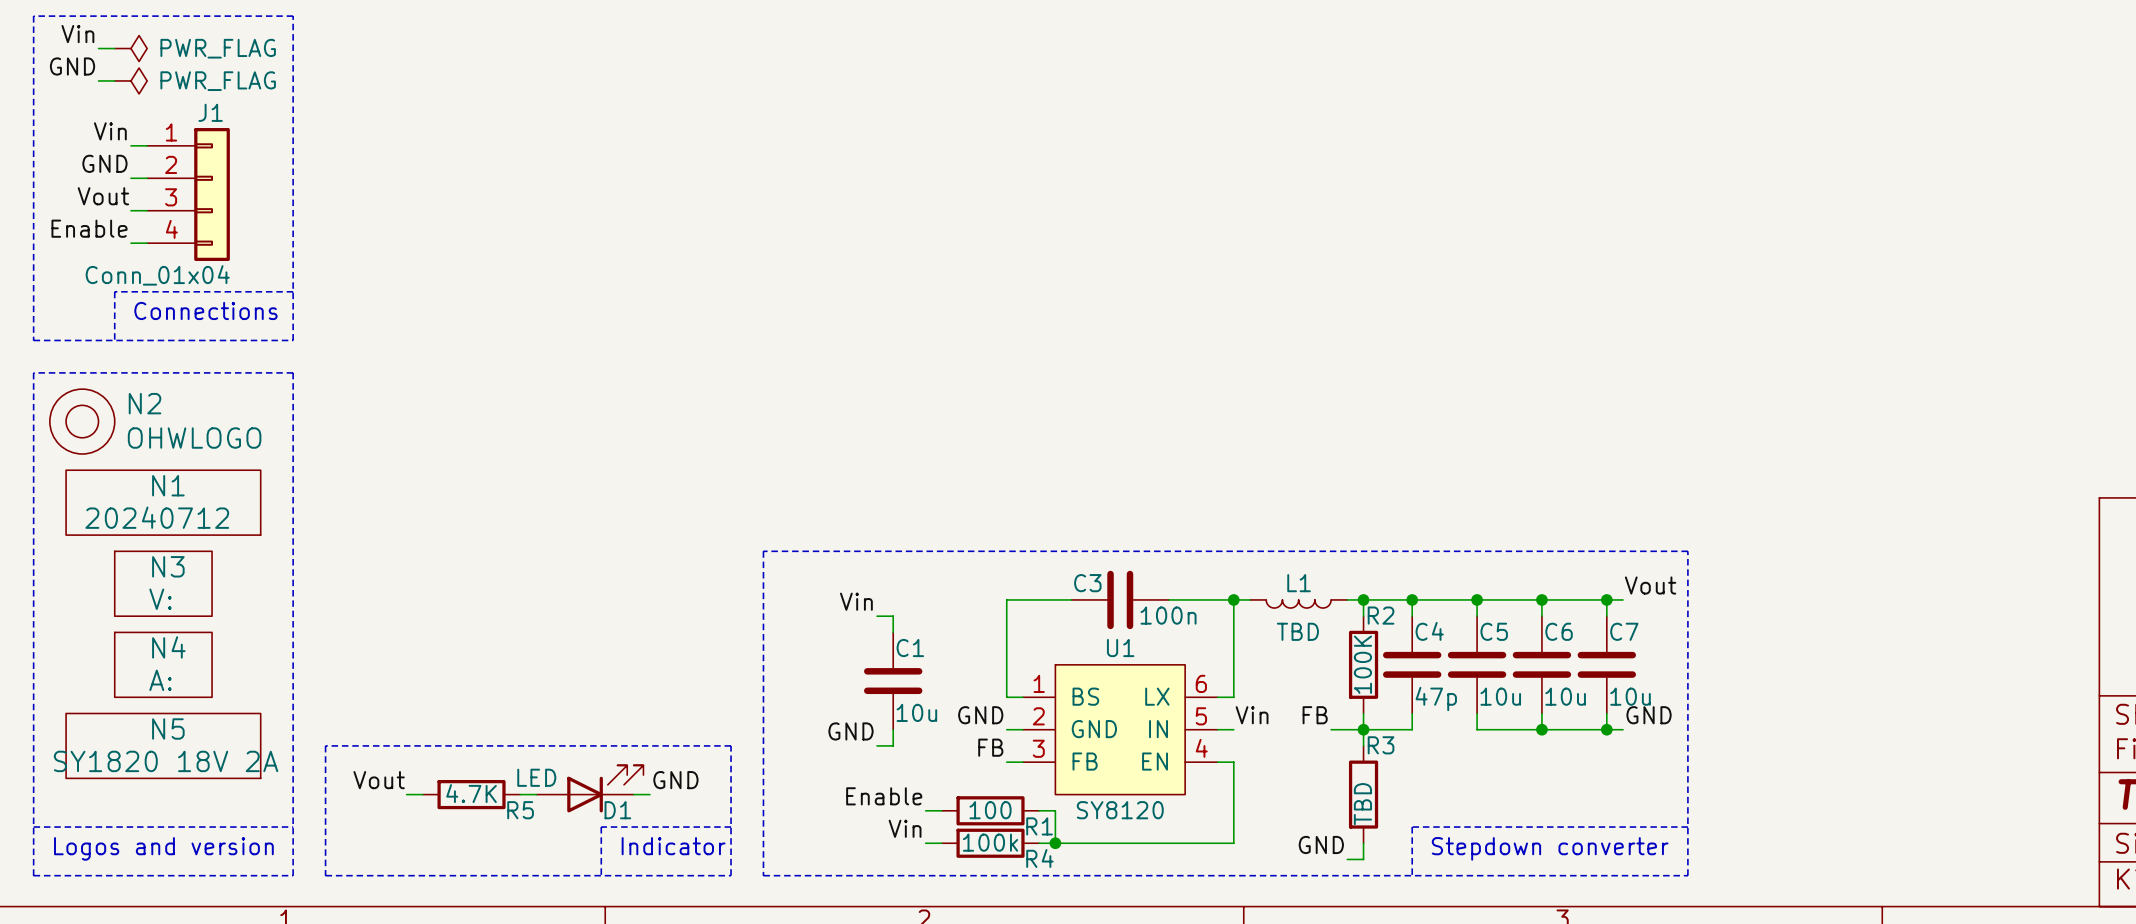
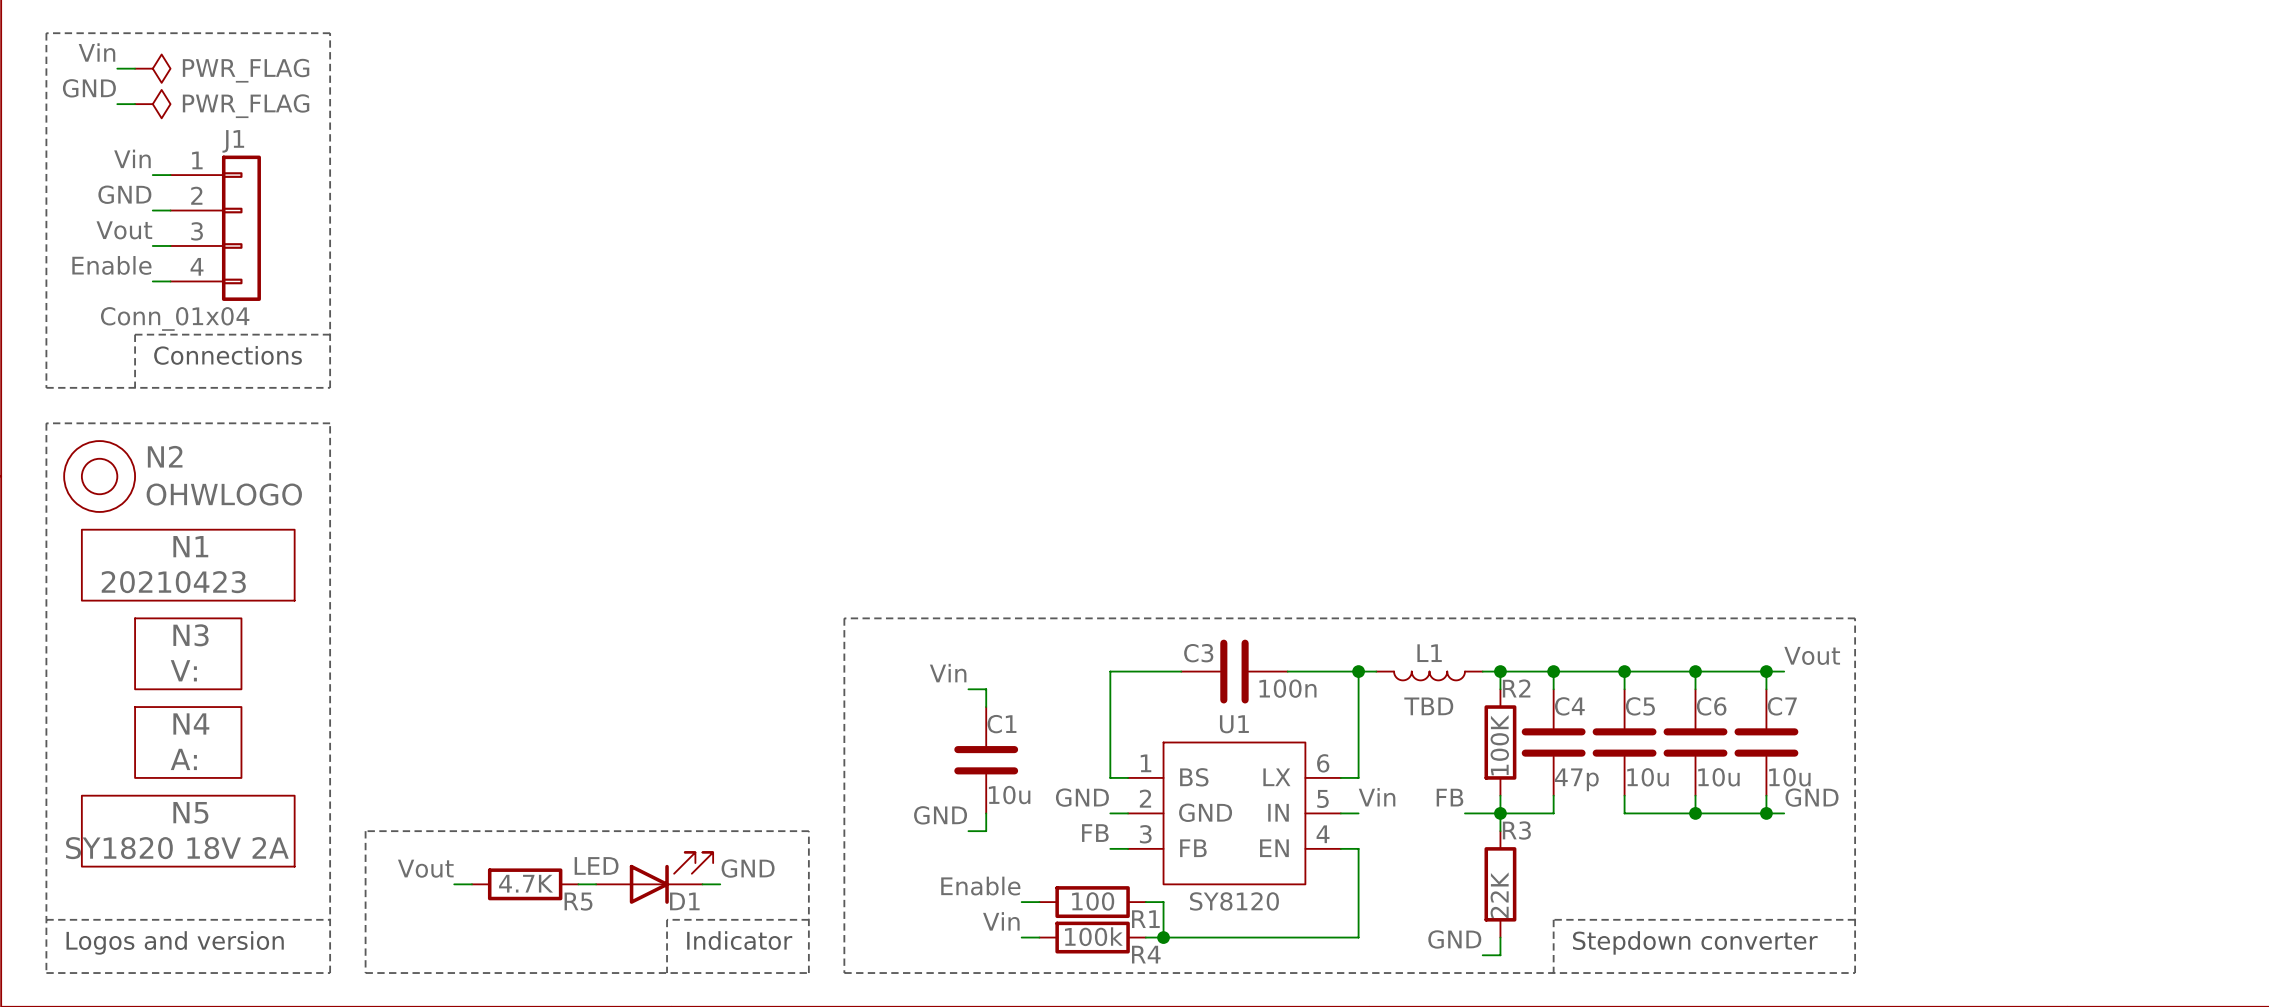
N1 value: 20240712 (157, 517) -> 20210423 (173, 582)
R3 value: TBD (1362, 804) -> 22K (1499, 895)

